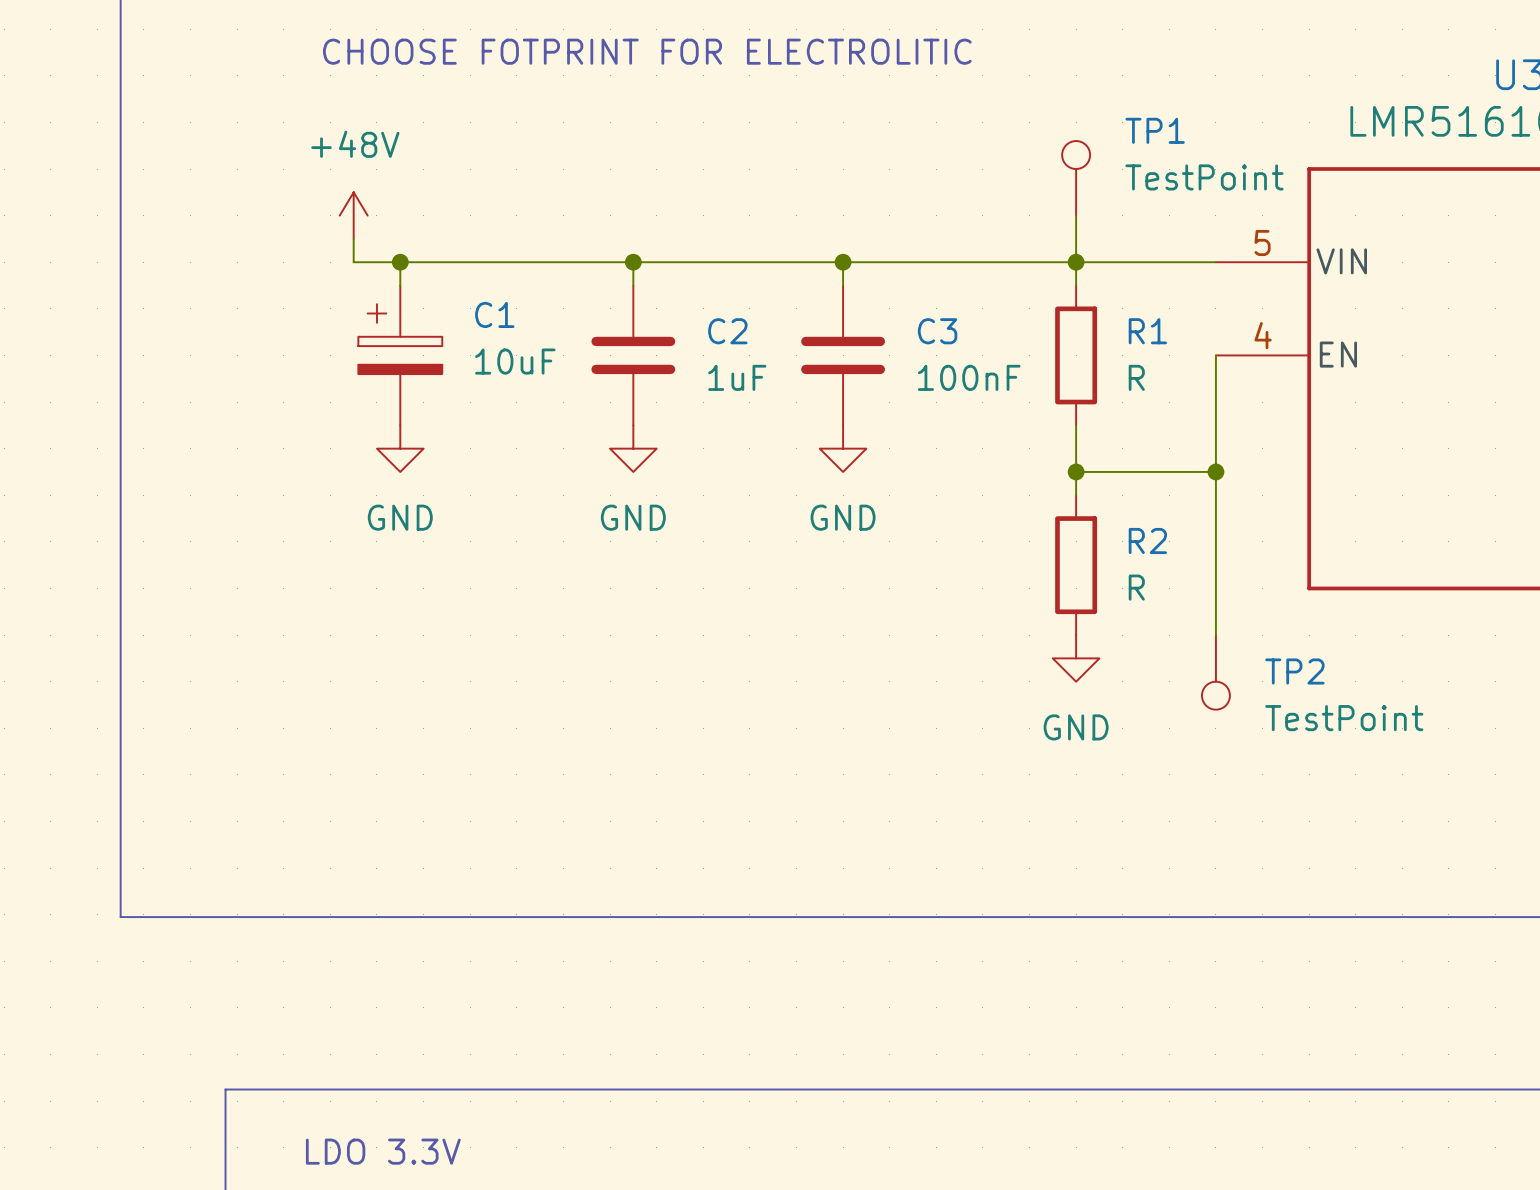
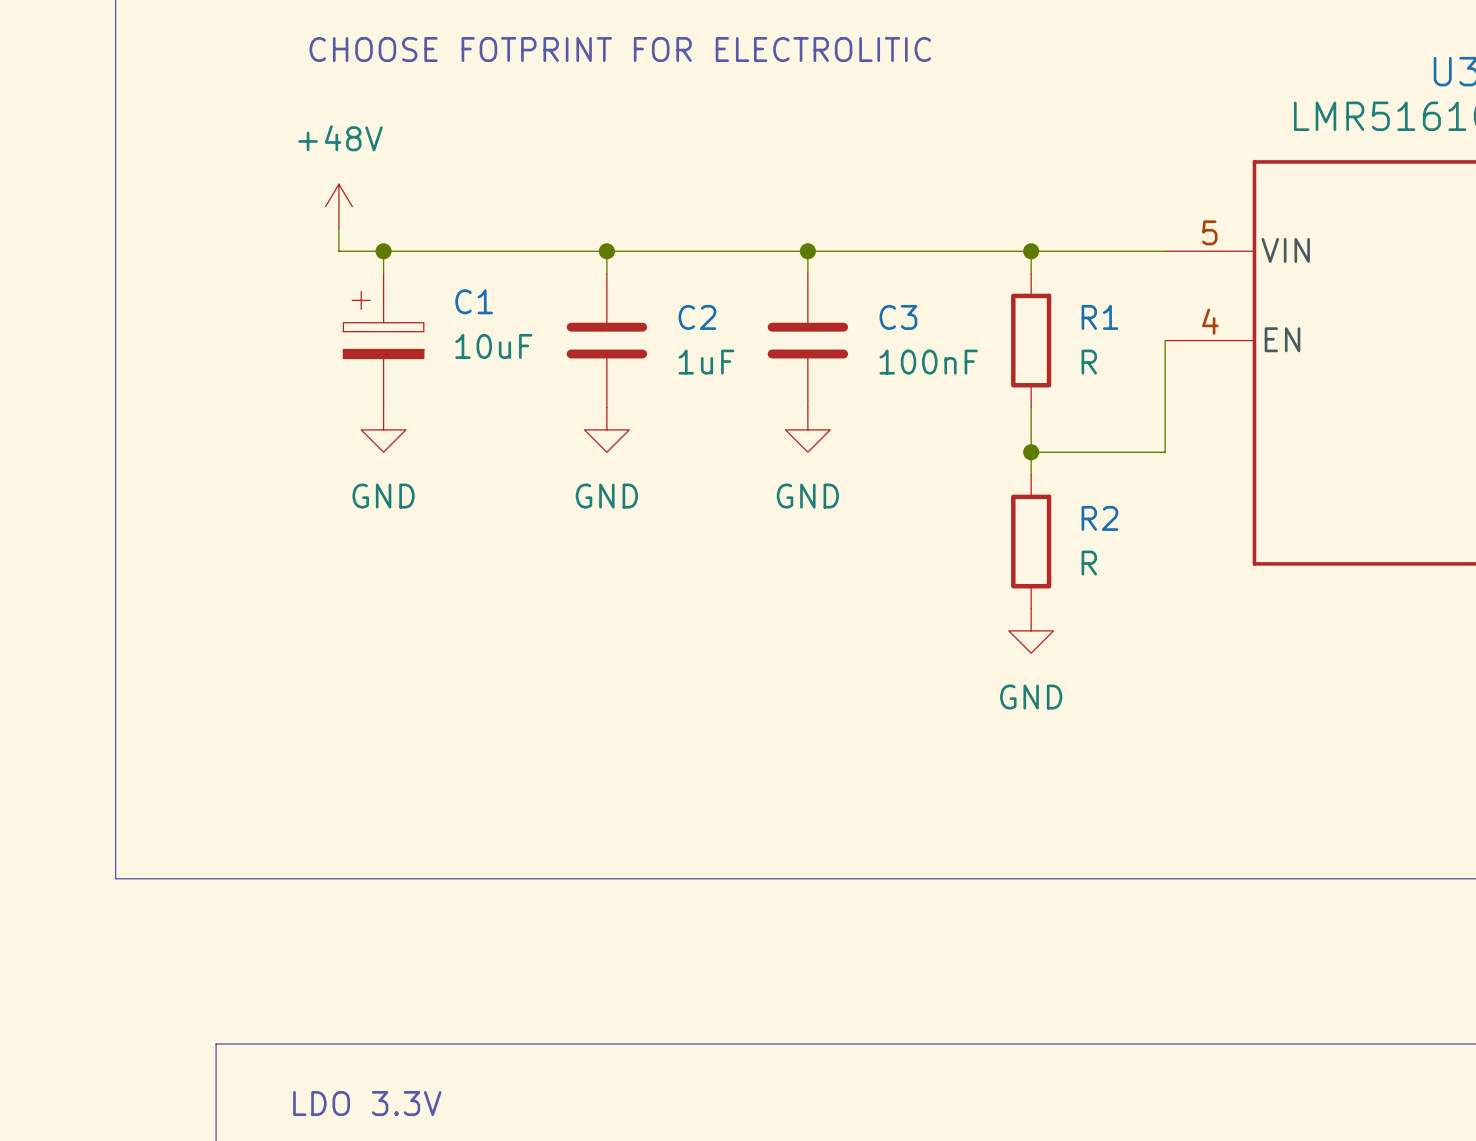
TP1: TestPoint (1076, 178) -> none
wire: (1076, 215) (1076, 262) -> none
wire: (1215, 471) (1215, 635) -> none
junction: (1215, 471) -> none
TP2: TestPoint (1215, 672) -> none

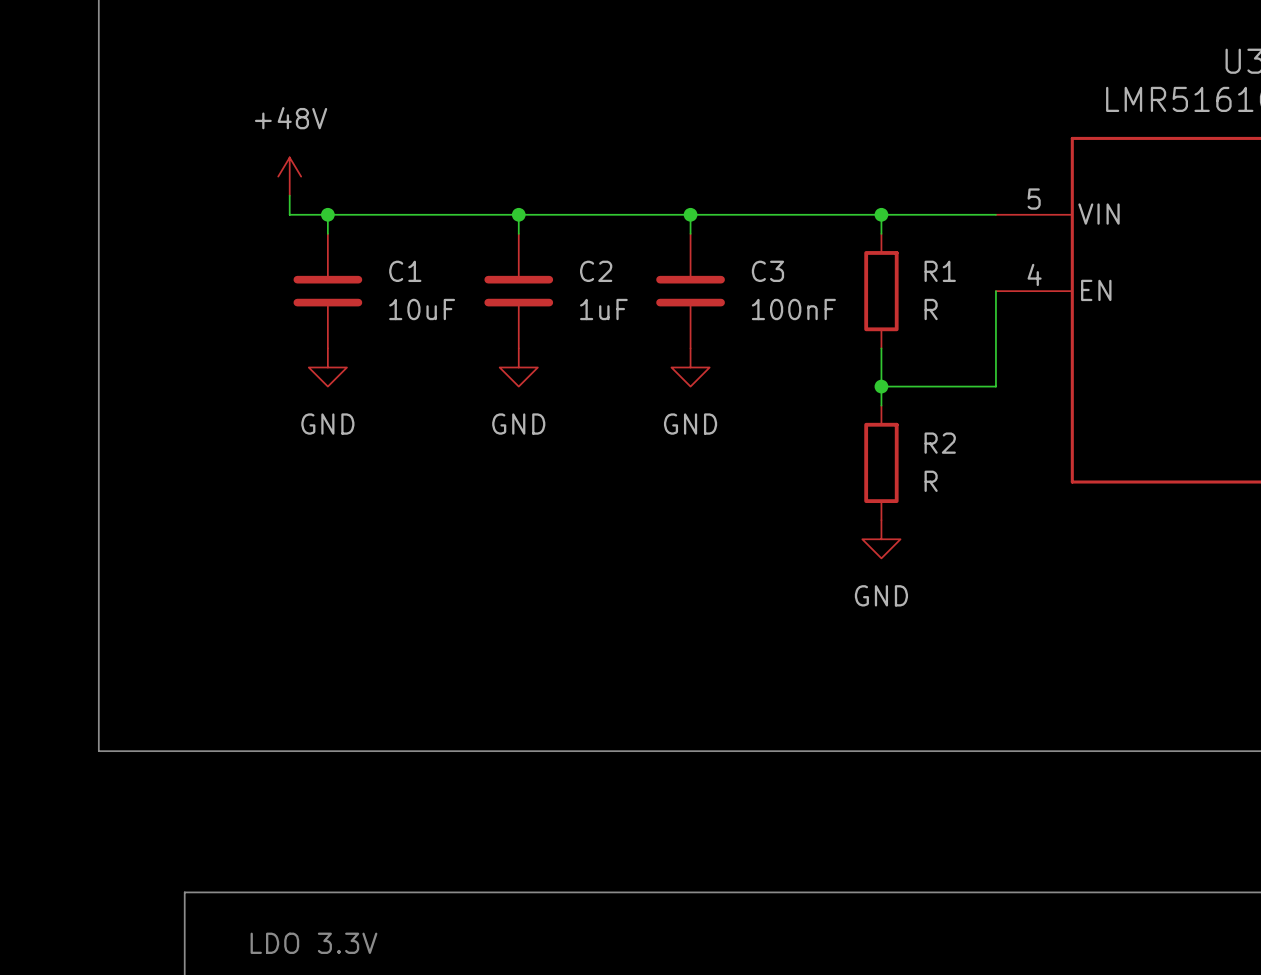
text: CHOOSE FOTPRINT FOR ELECTROLITIC (620, 49) -> none
C1 symbol: [343, 273, 424, 408] -> [293, 233, 363, 349]

